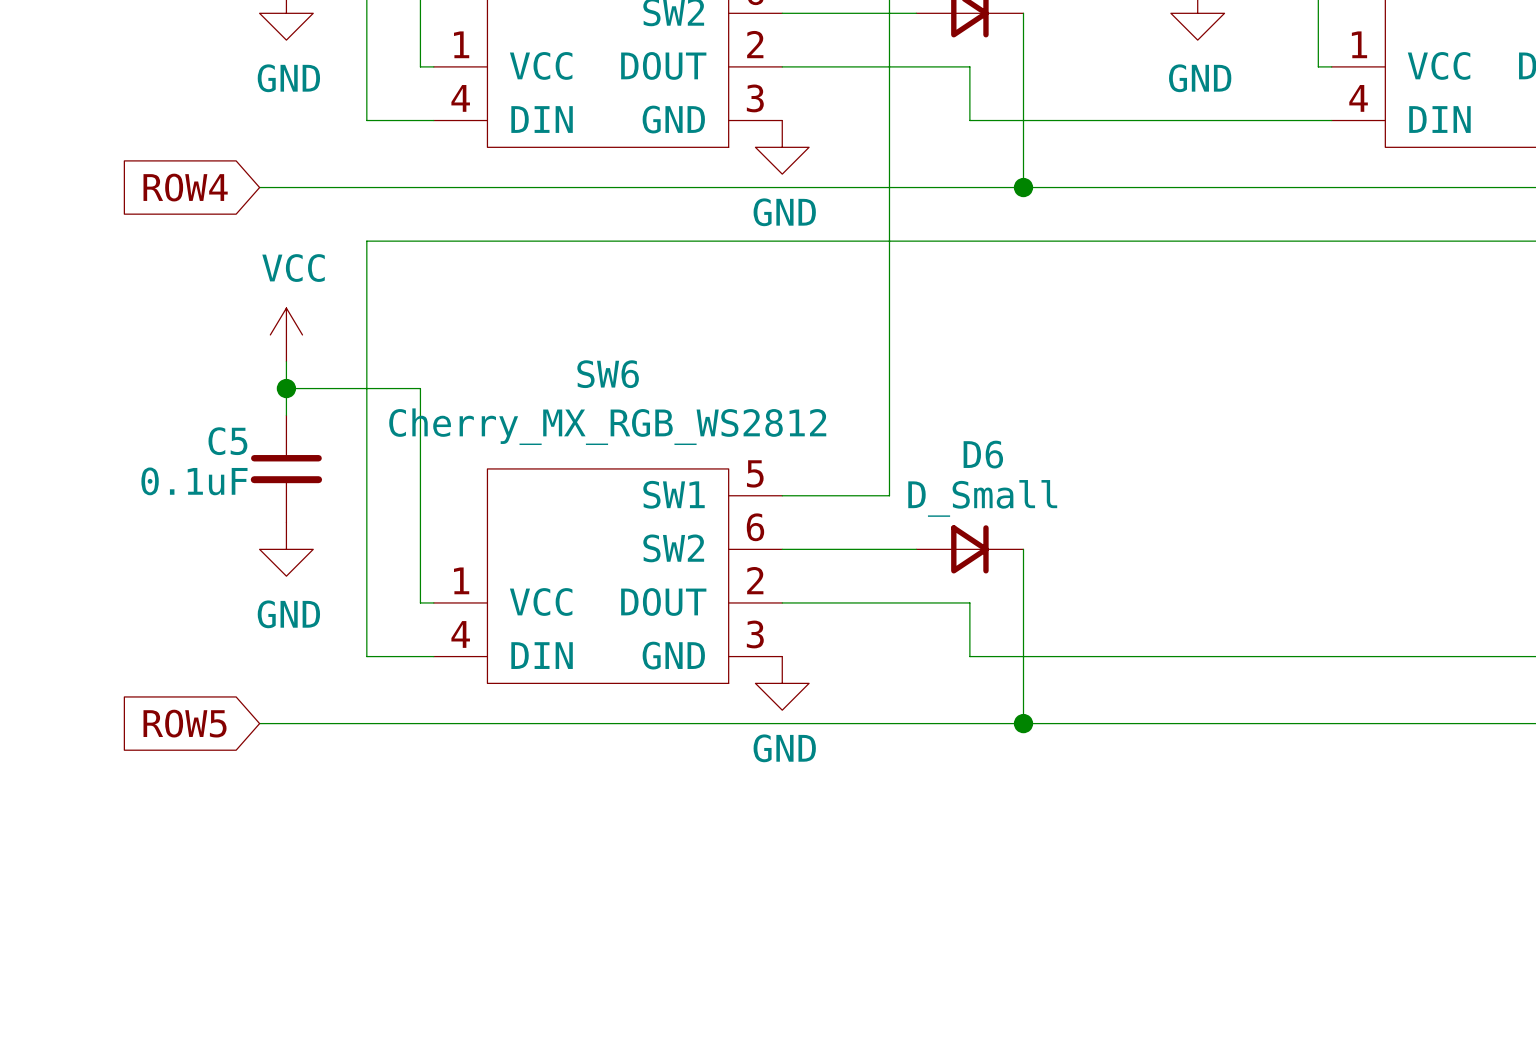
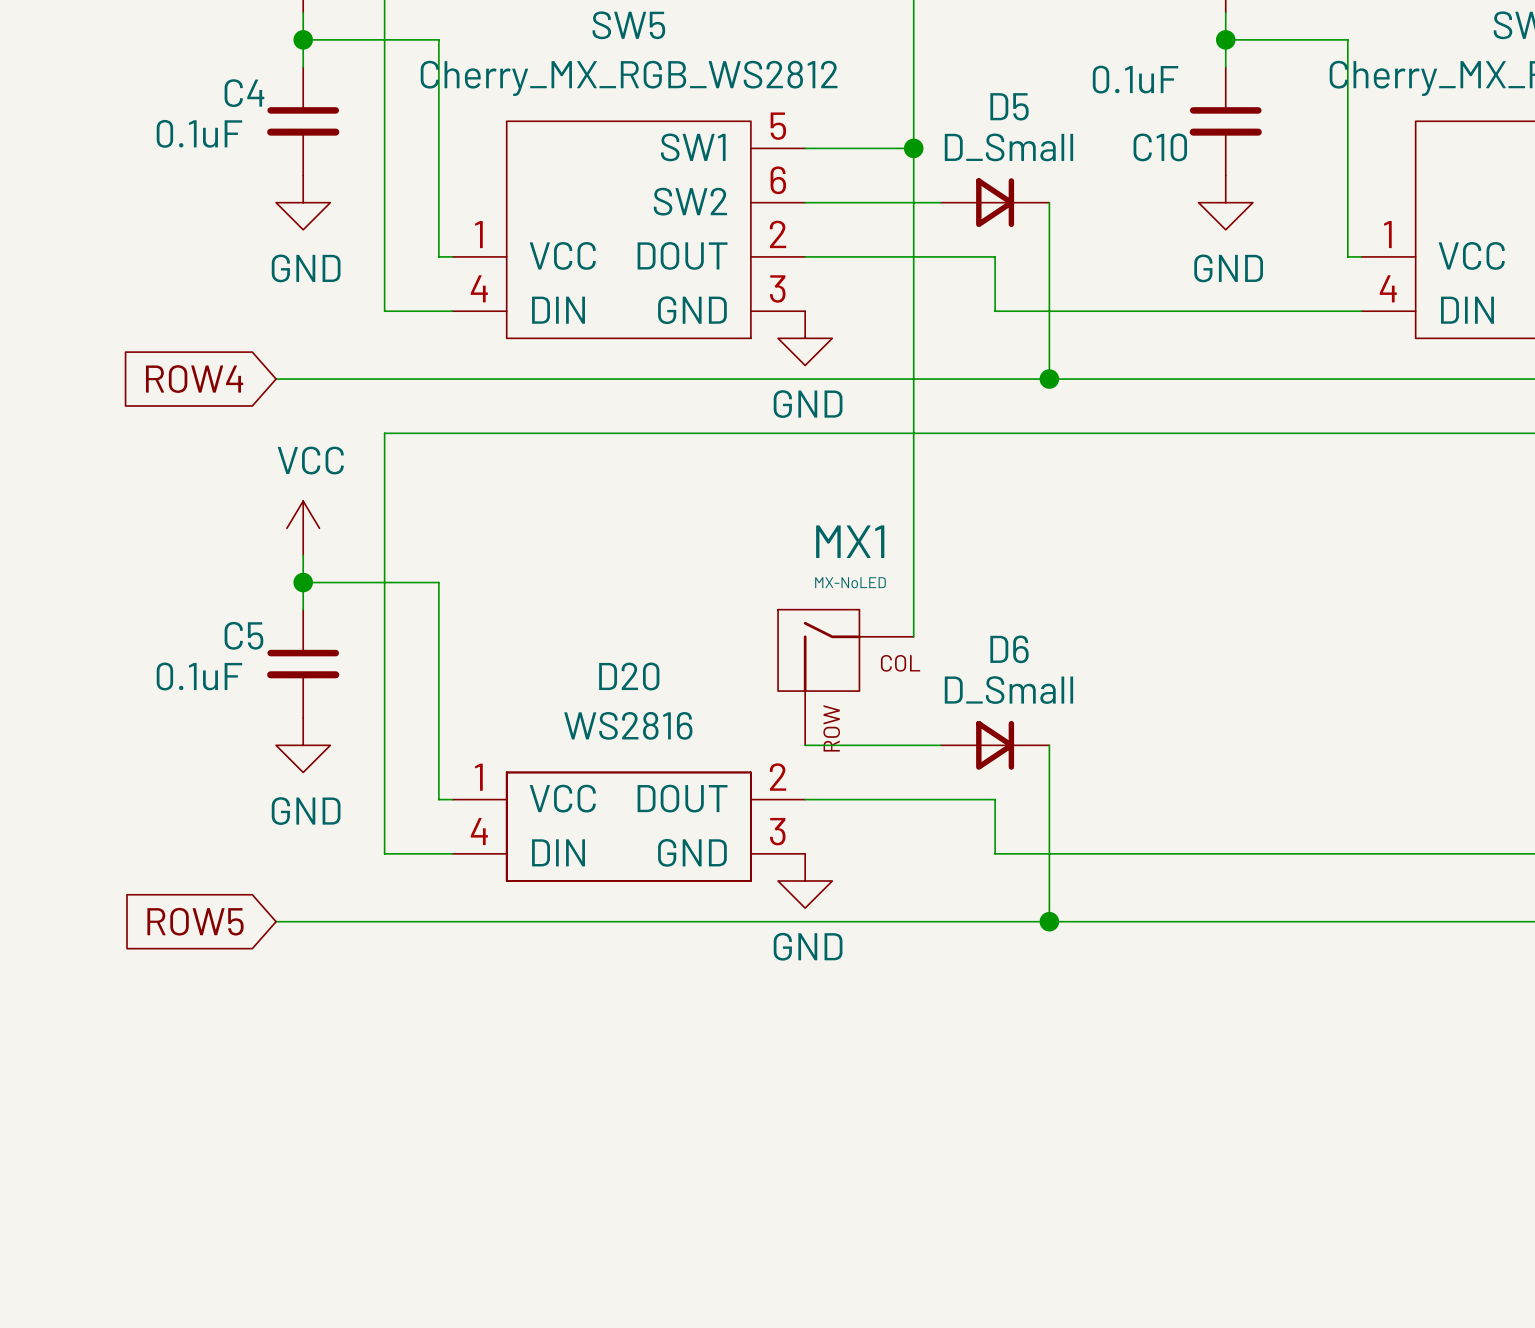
wire: (889, 442) (889, 495) (782, 495) -> none
MX1: none -> MX-NoLED (845, 677)
SW6: Cherry_MX_RGB_WS2812 (608, 576) -> none
D20: none -> WS2816 (628, 826)

